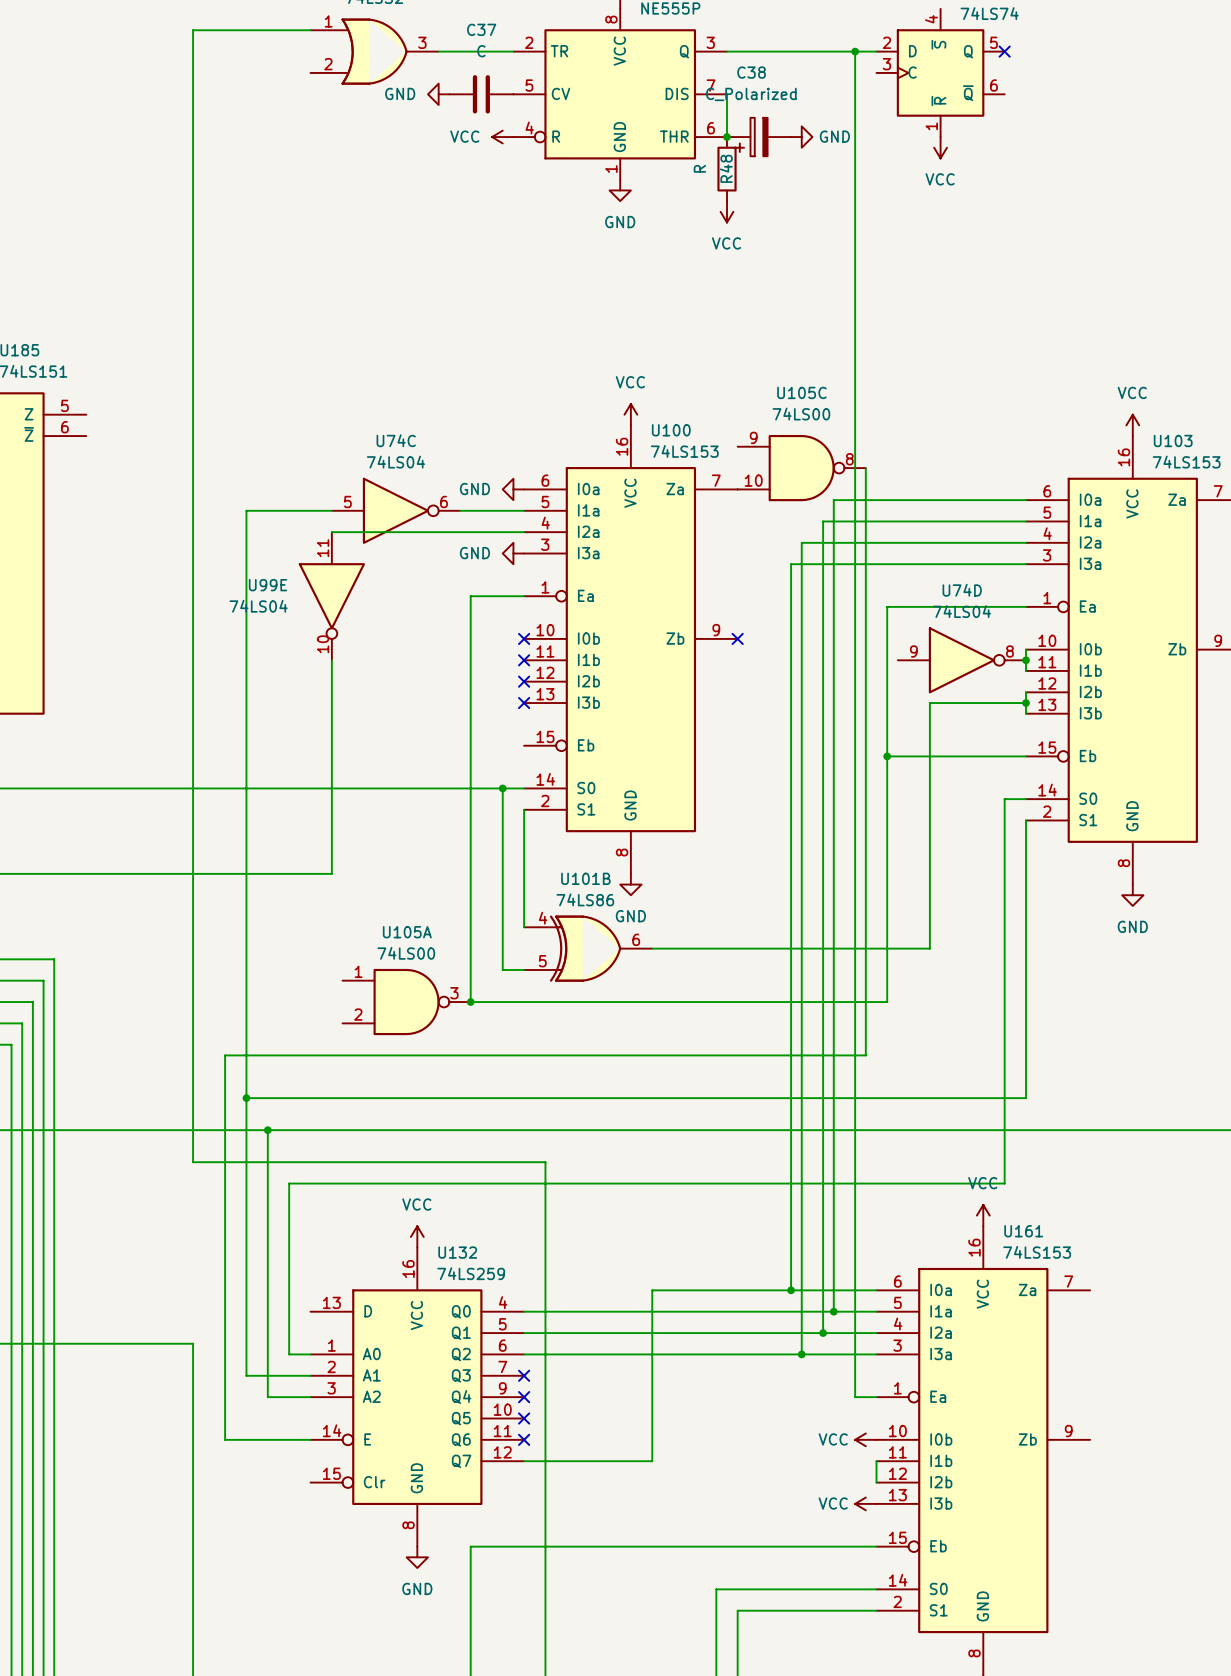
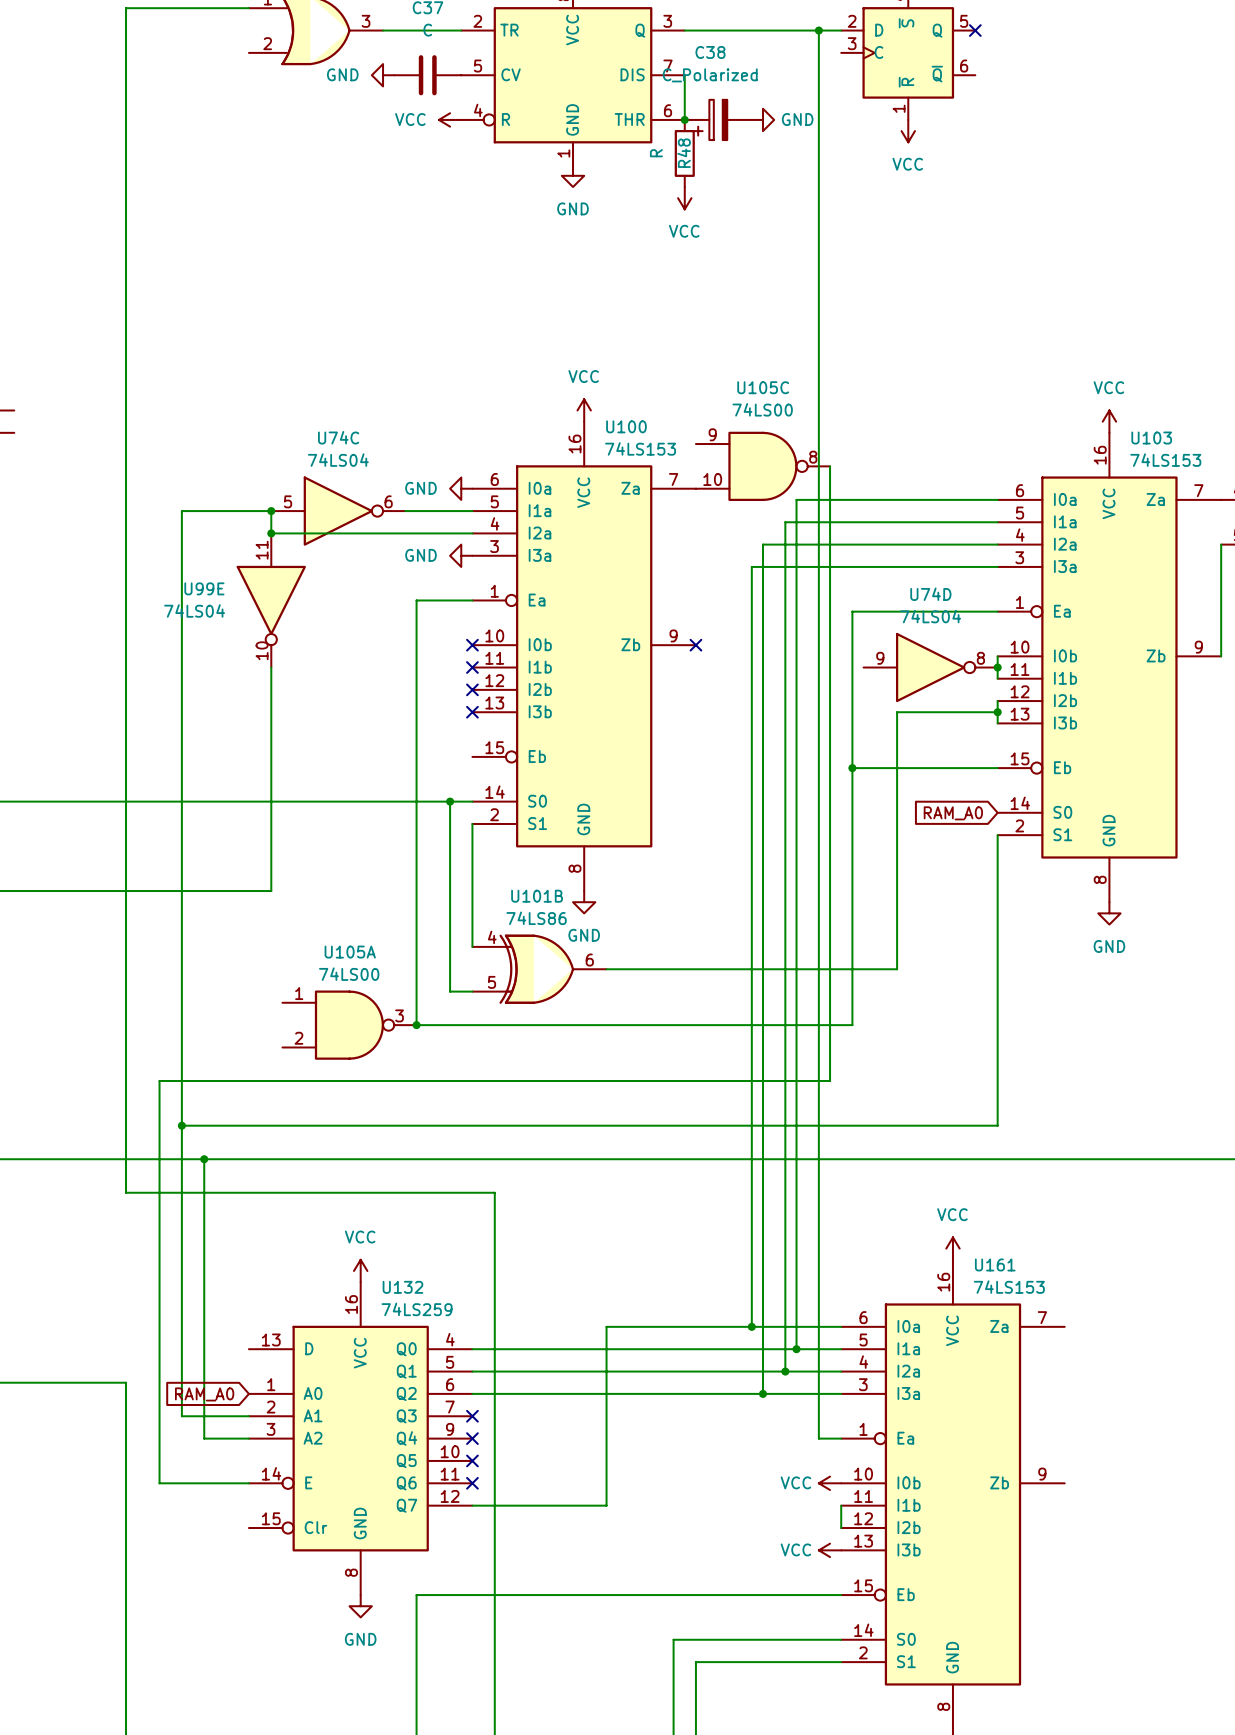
wire: none -> (271, 511) (271, 533)
junction: none -> (271, 511)
junction: none -> (271, 533)
global label: none -> RAM_A0 (953, 813)
wire: (1026, 799) (1004, 799) (1004, 1183) (289, 1183) (289, 1354) (310, 1354) -> none
global label: none -> RAM_A0 (204, 1394)

